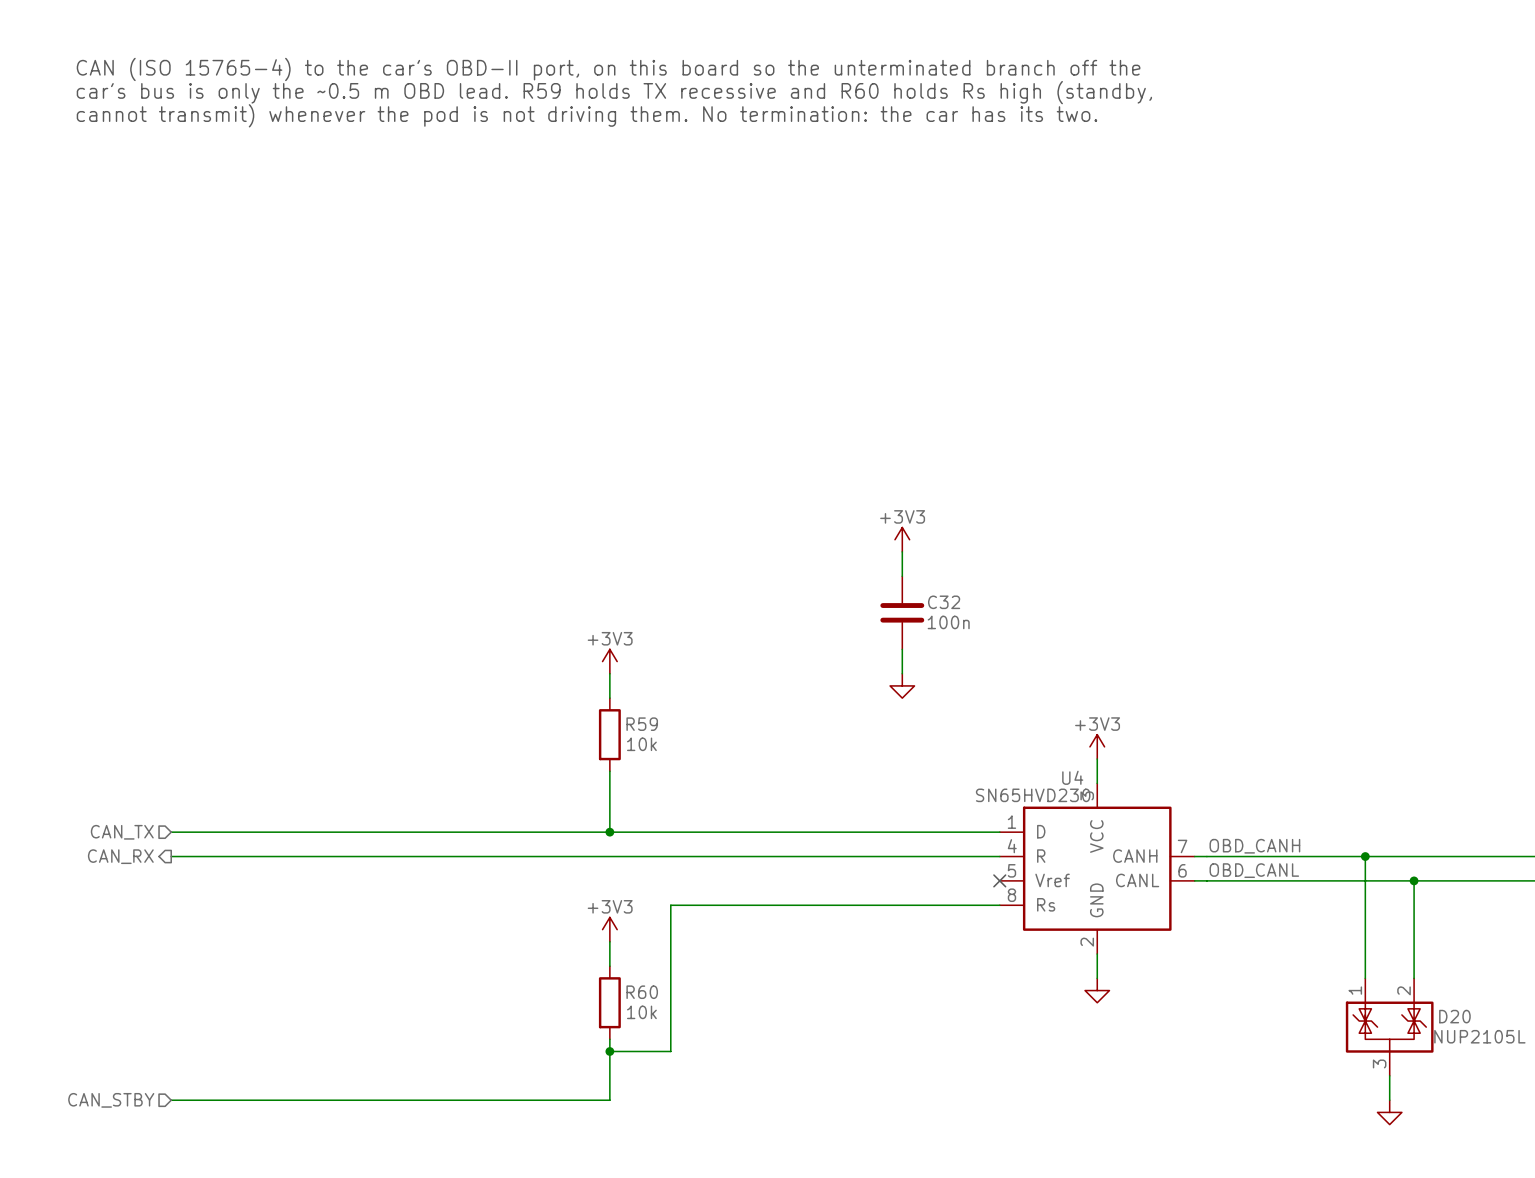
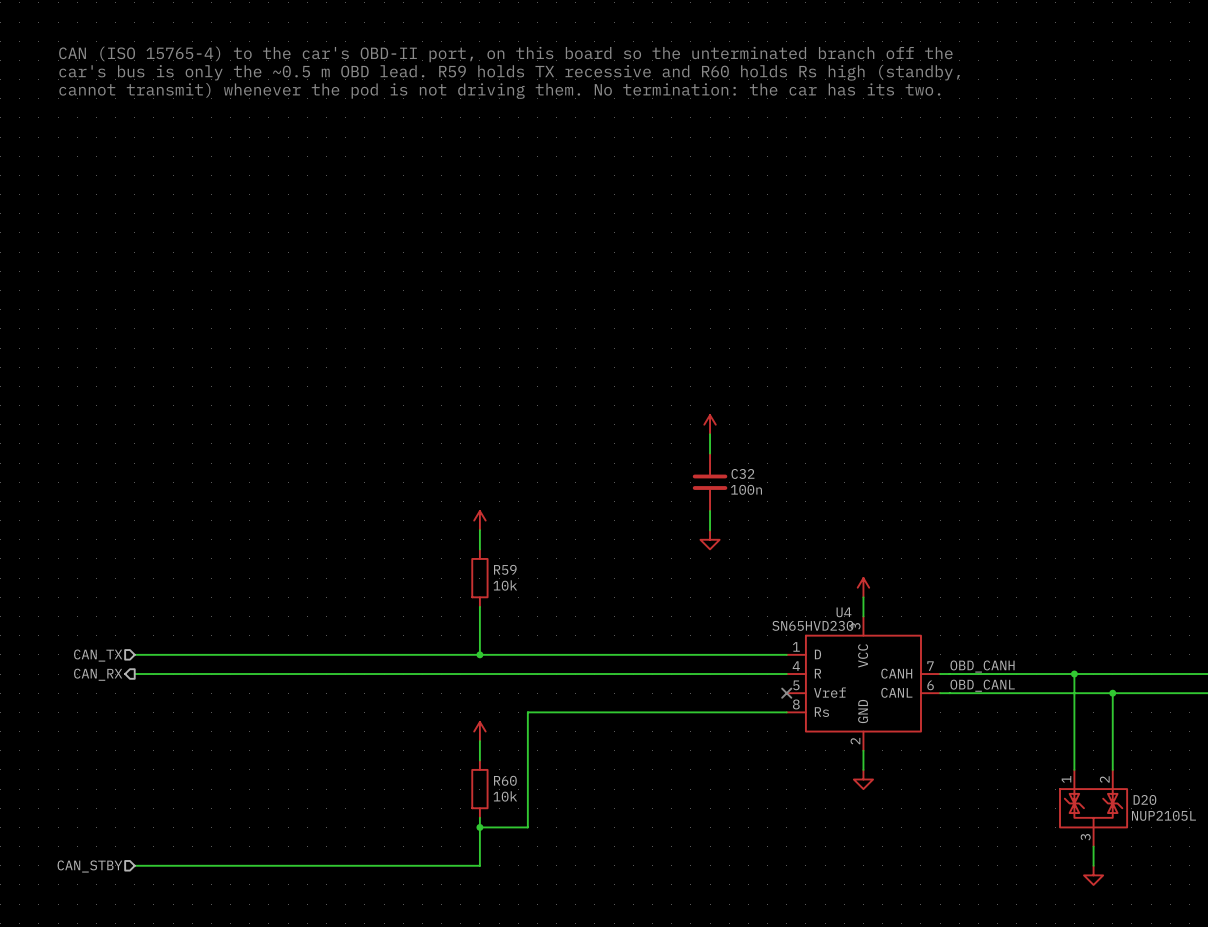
power symbol text: +3V3 (902, 516) -> none
power symbol text: +3V3 (610, 638) -> none
power symbol text: +3V3 (1097, 724) -> none
power symbol text: +3V3 (610, 906) -> none

